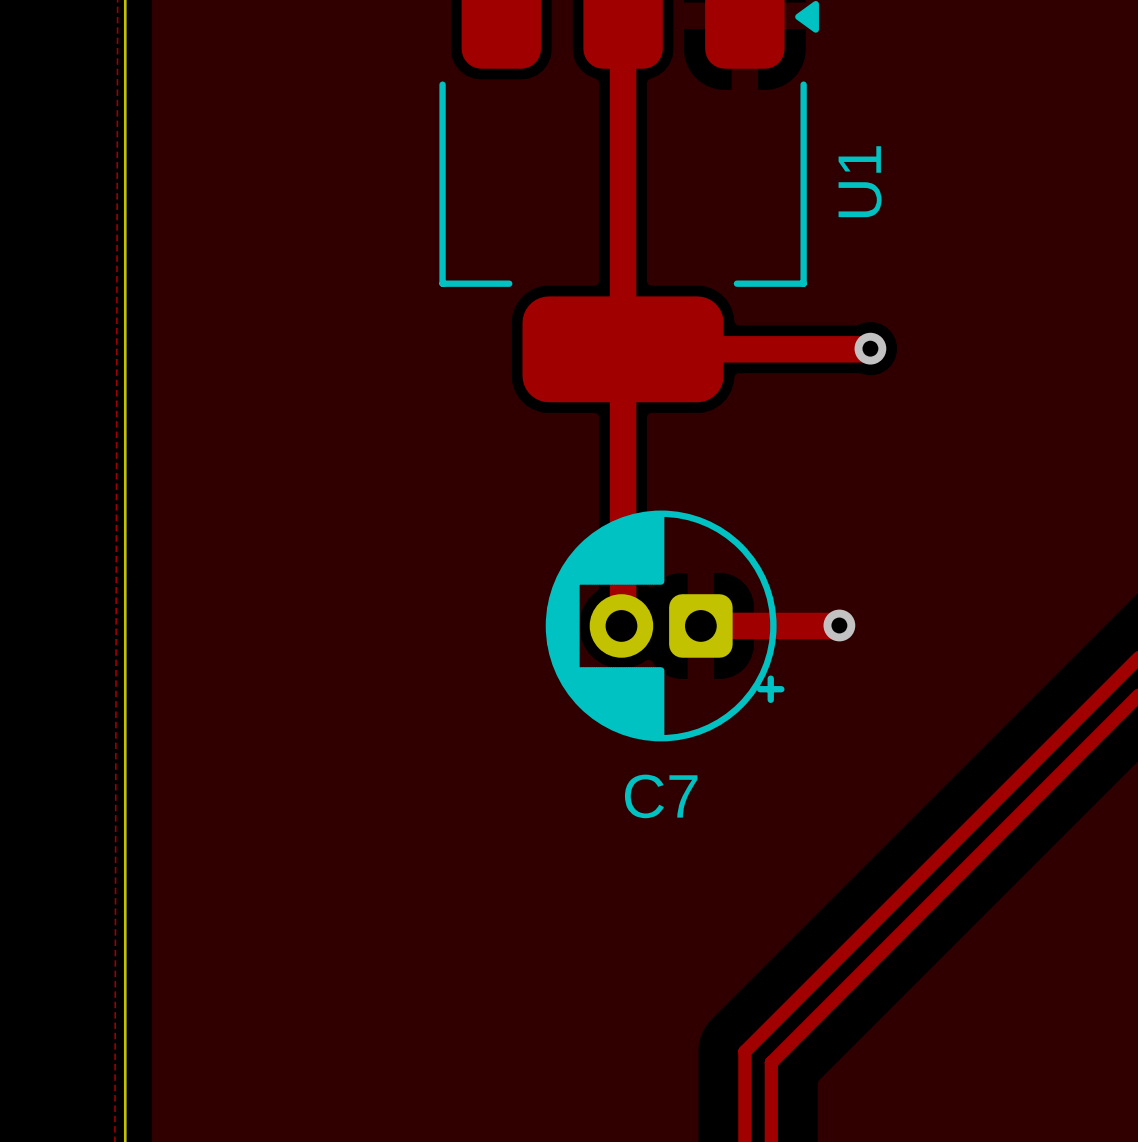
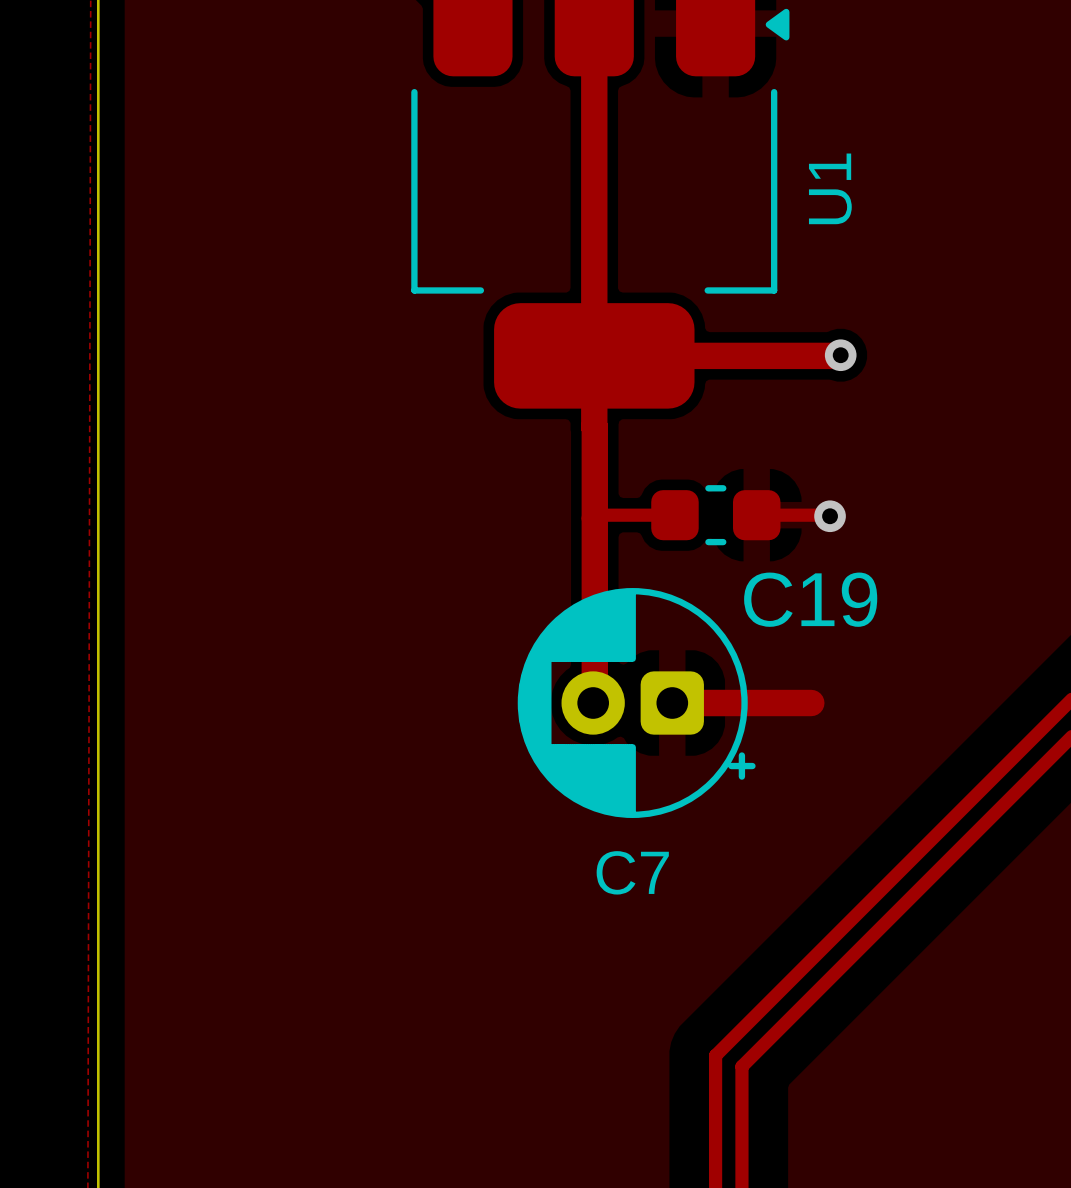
track: (623, 420) (623, 624) -> (594, 427) (594, 701)
track: none -> (674, 515) (597, 515) (594, 518)
C19: none -> (715, 515)
track: none -> (756, 515) (830, 516)
C7 position: (665, 625) -> (636, 703)
track: (700, 625) (840, 625) -> (672, 703) (811, 703)
via position: (839, 625) -> (830, 516)

